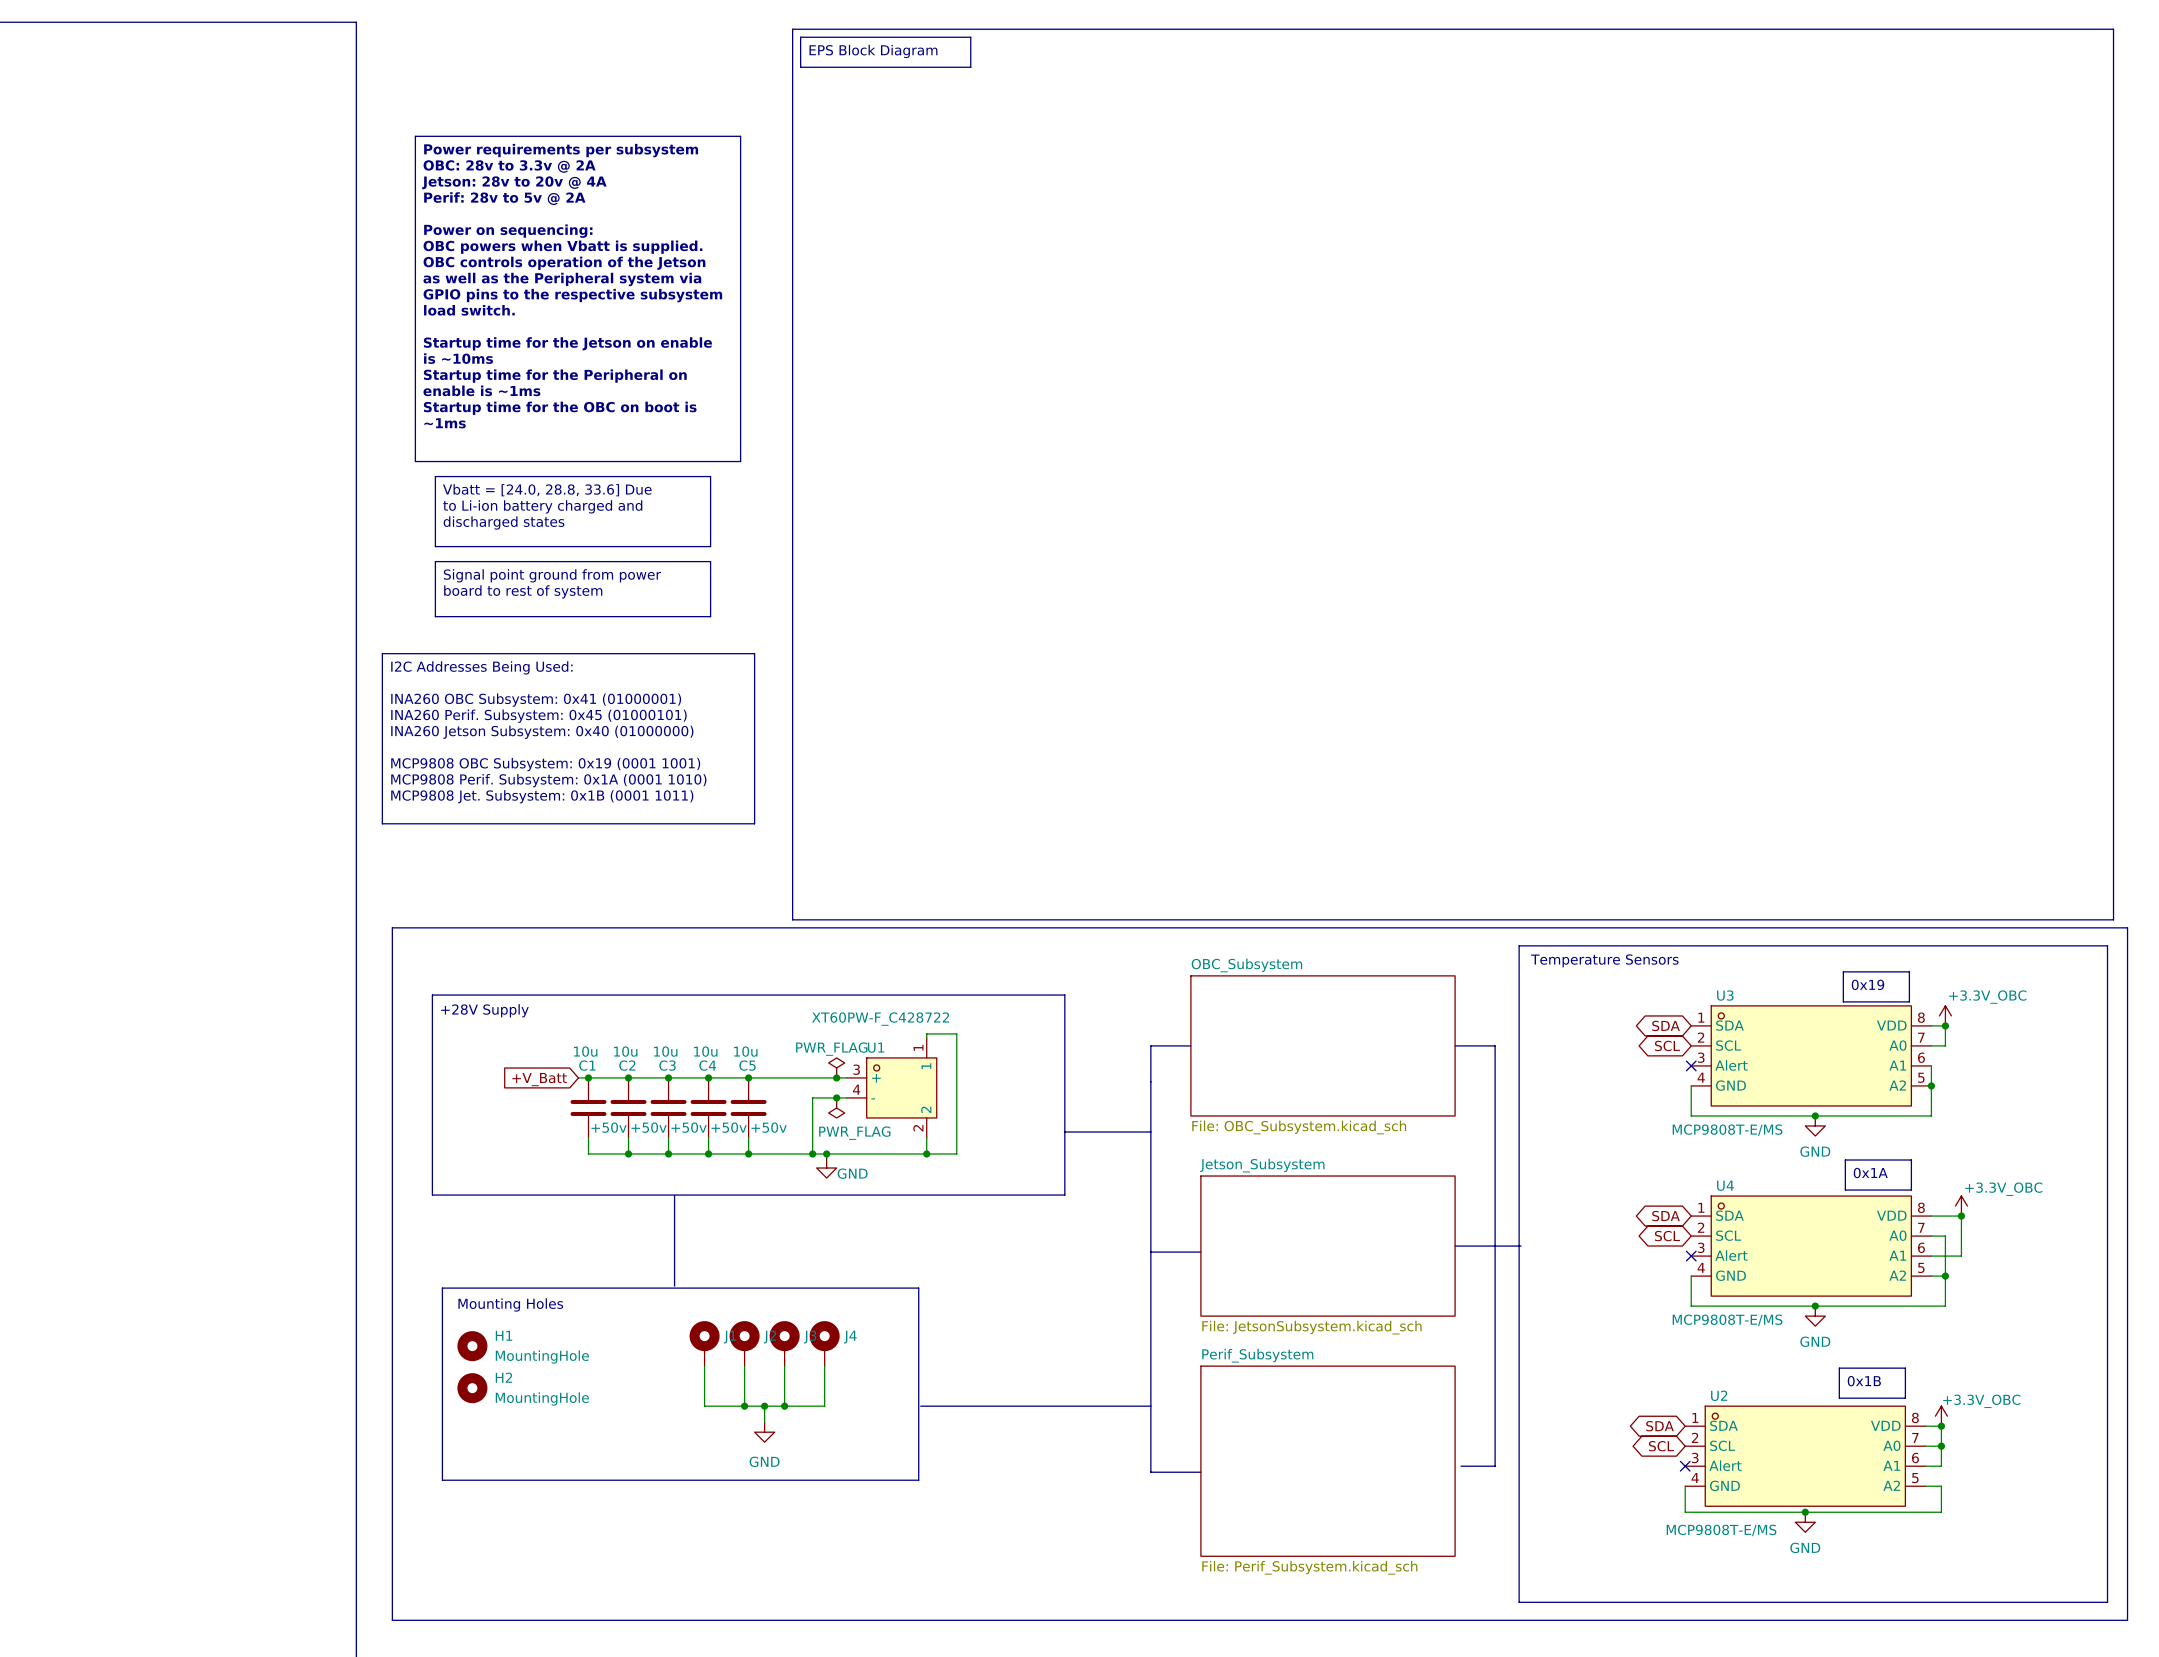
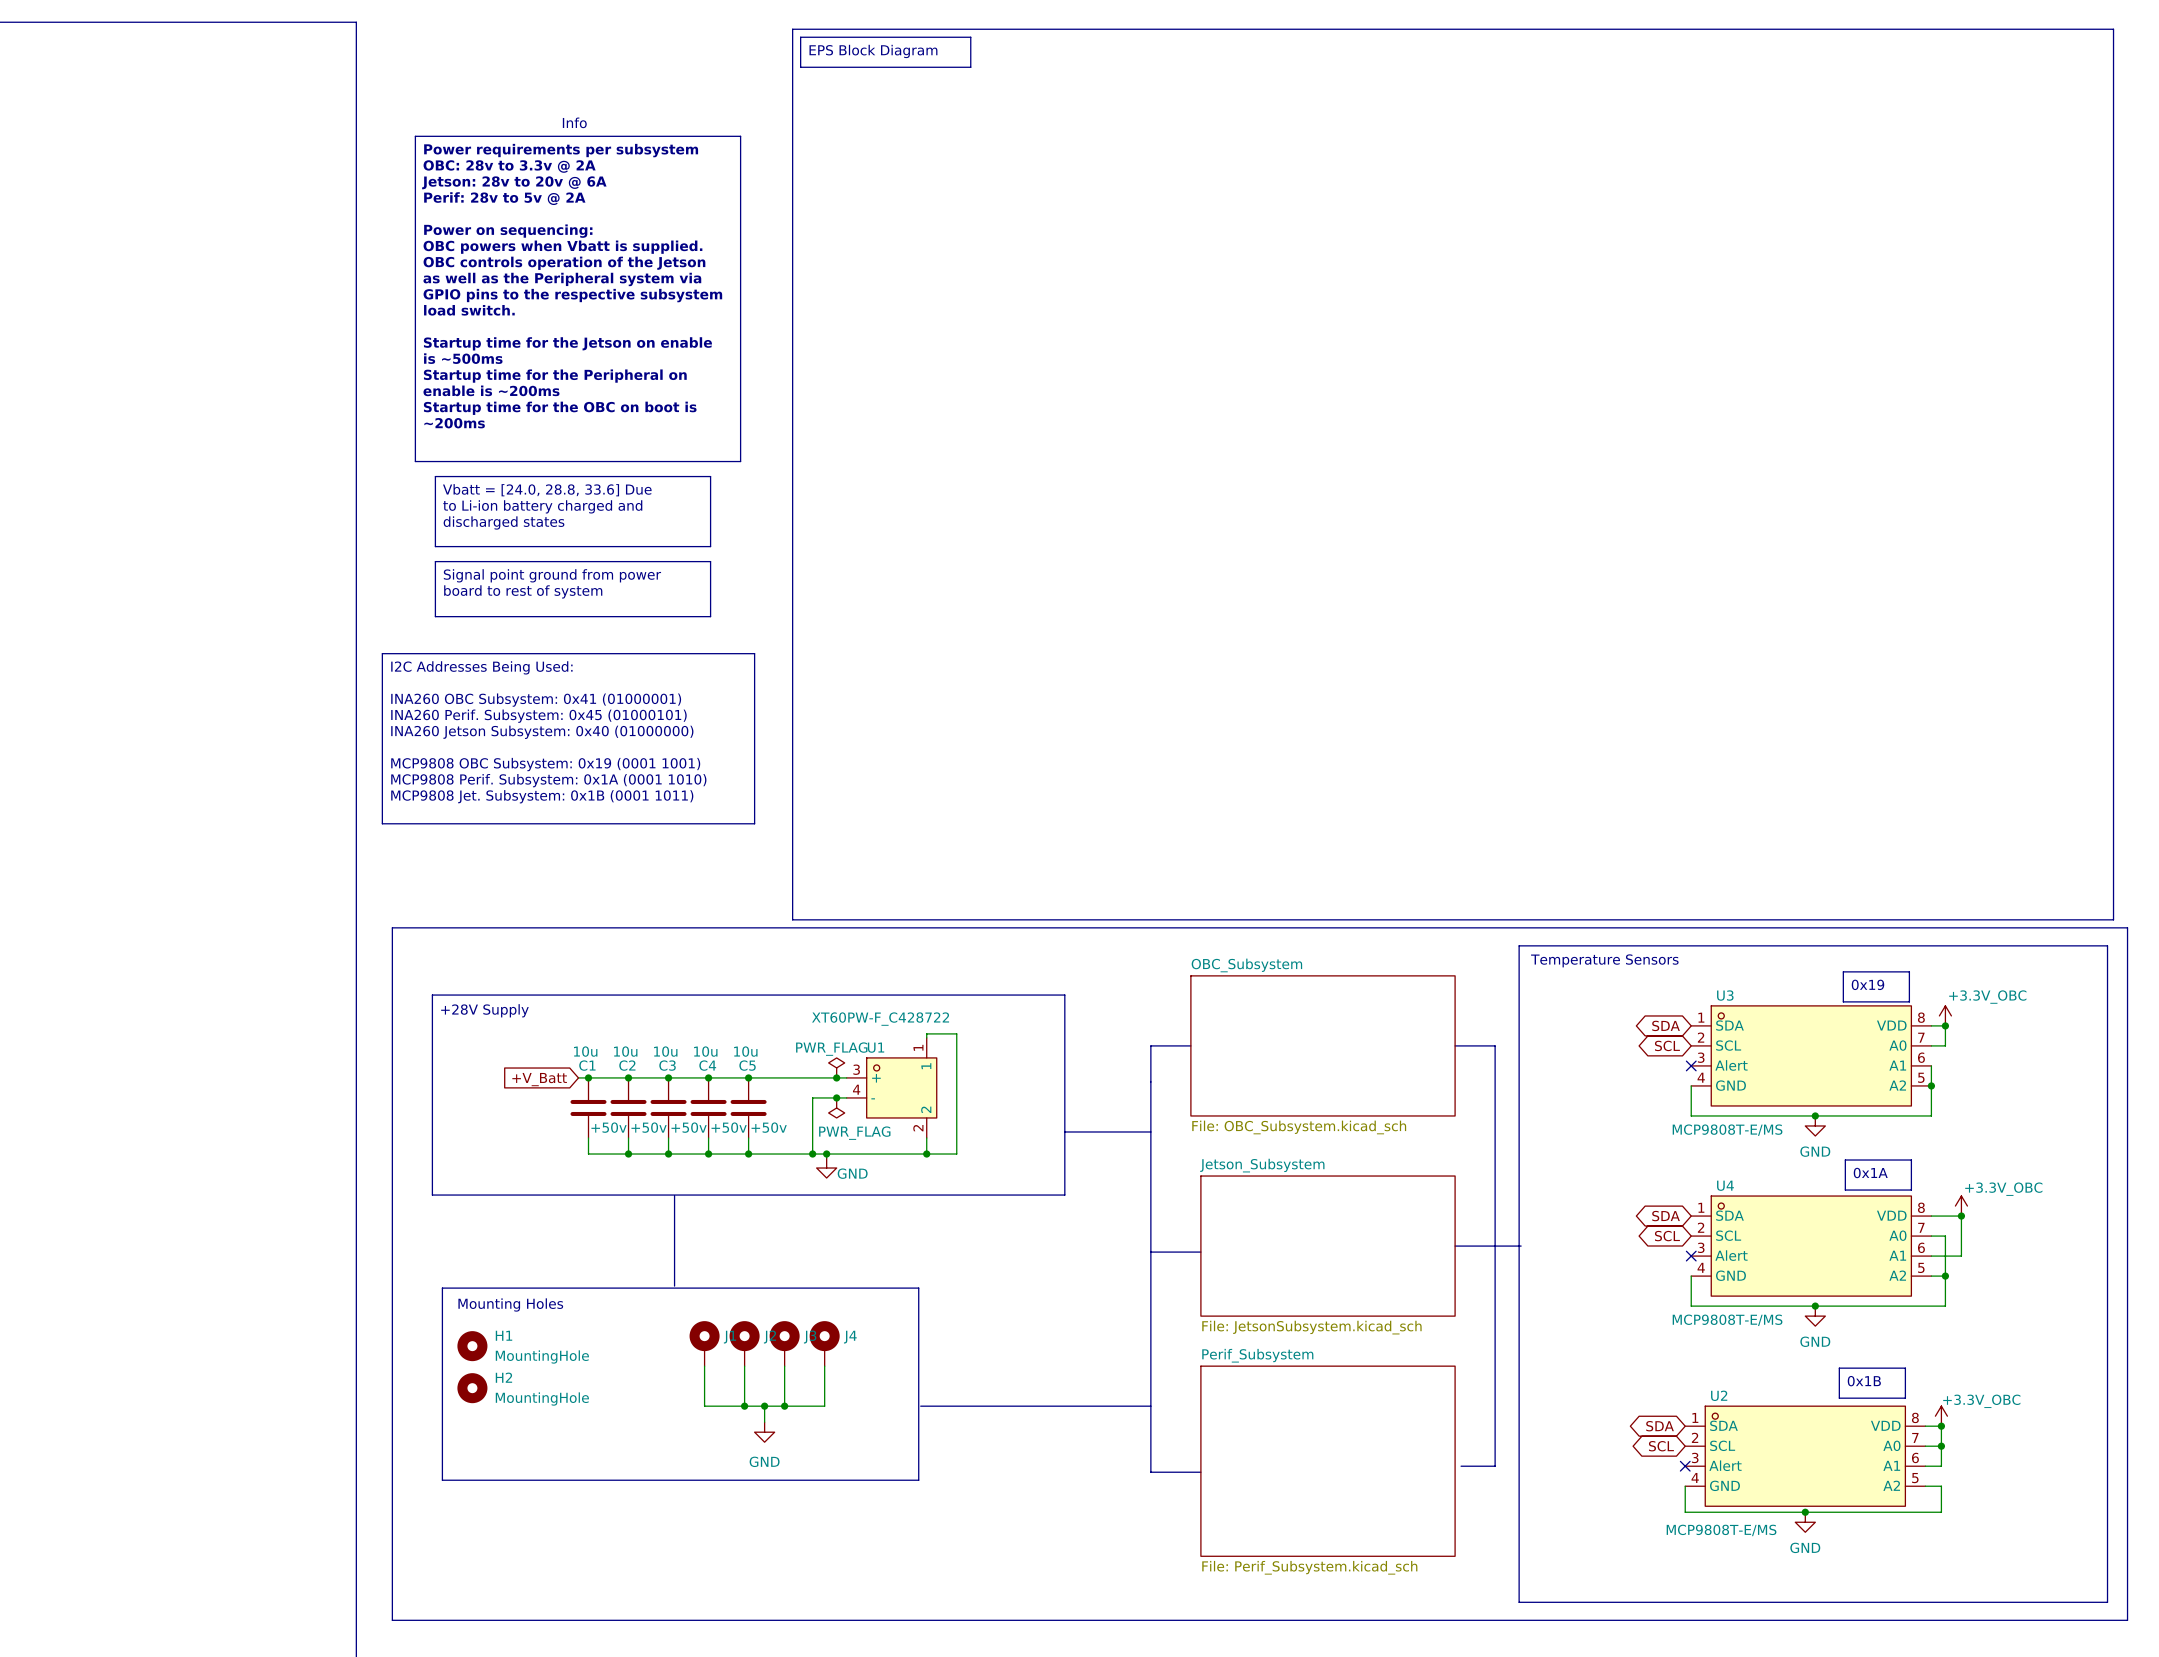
text: none -> Info (574, 122)
text: Jetson: 28v to 20v @ 4A (514, 182) -> Jetson: 28v to 20v @ 6A (514, 182)
text: is ~10ms (458, 358) -> is ~500ms (463, 358)
text: enable is ~1ms (481, 390) -> enable is ~200ms (491, 390)
text: ~1ms (445, 423) -> ~200ms (454, 423)

